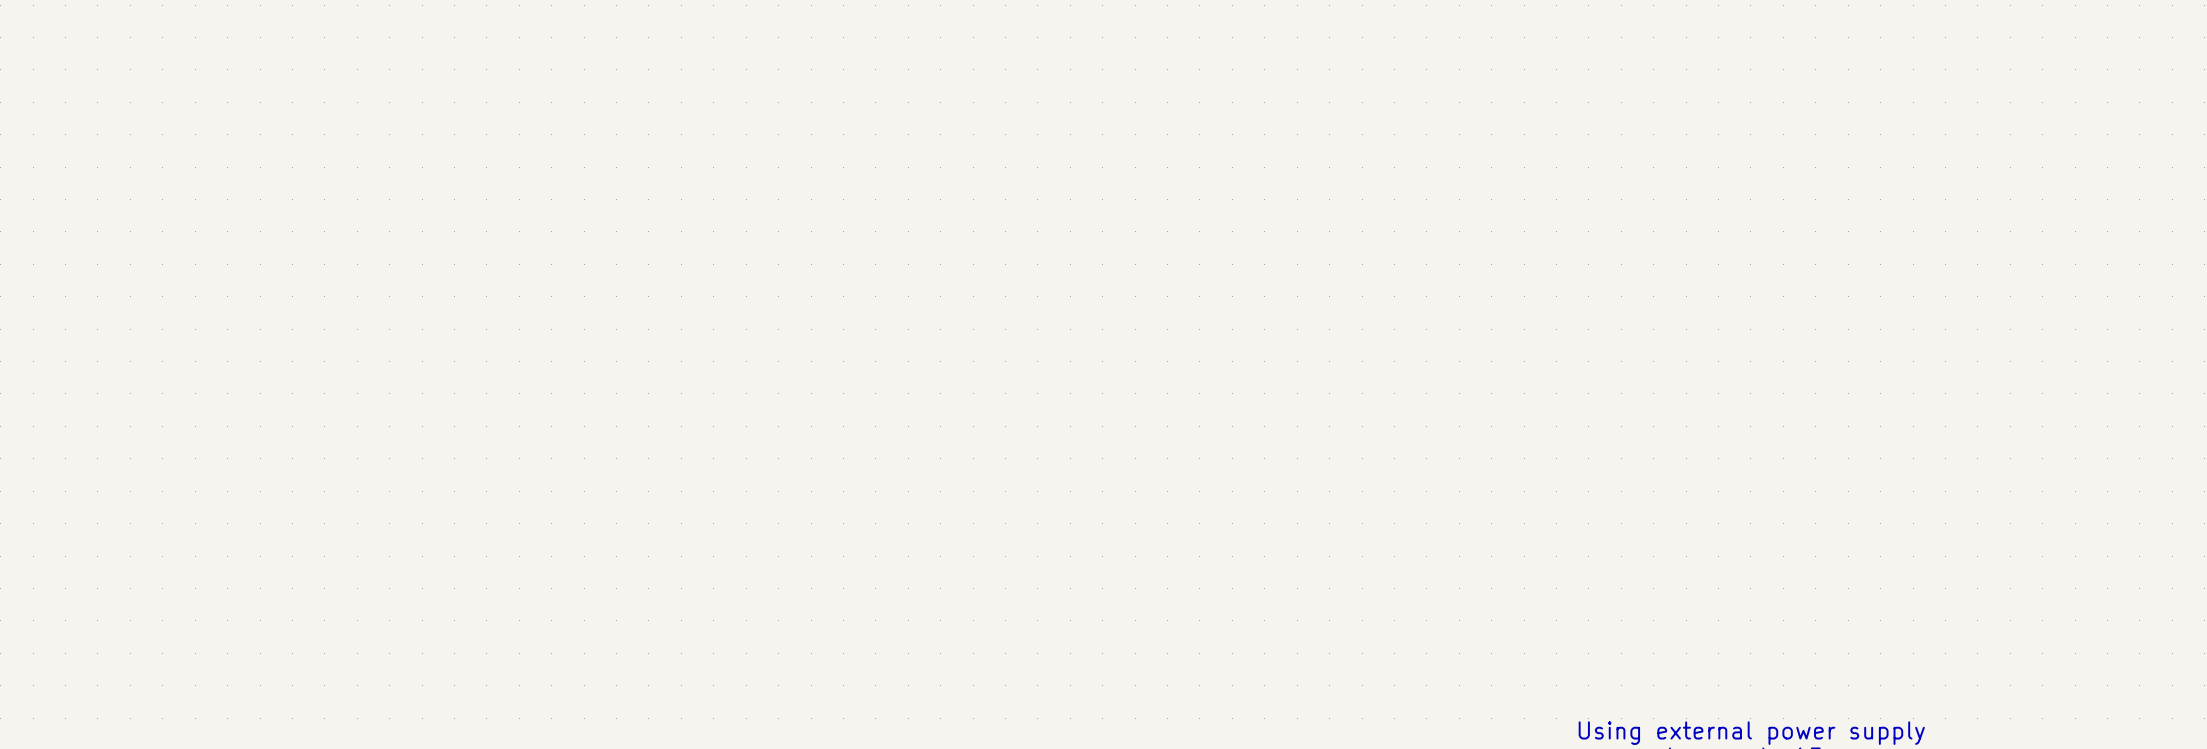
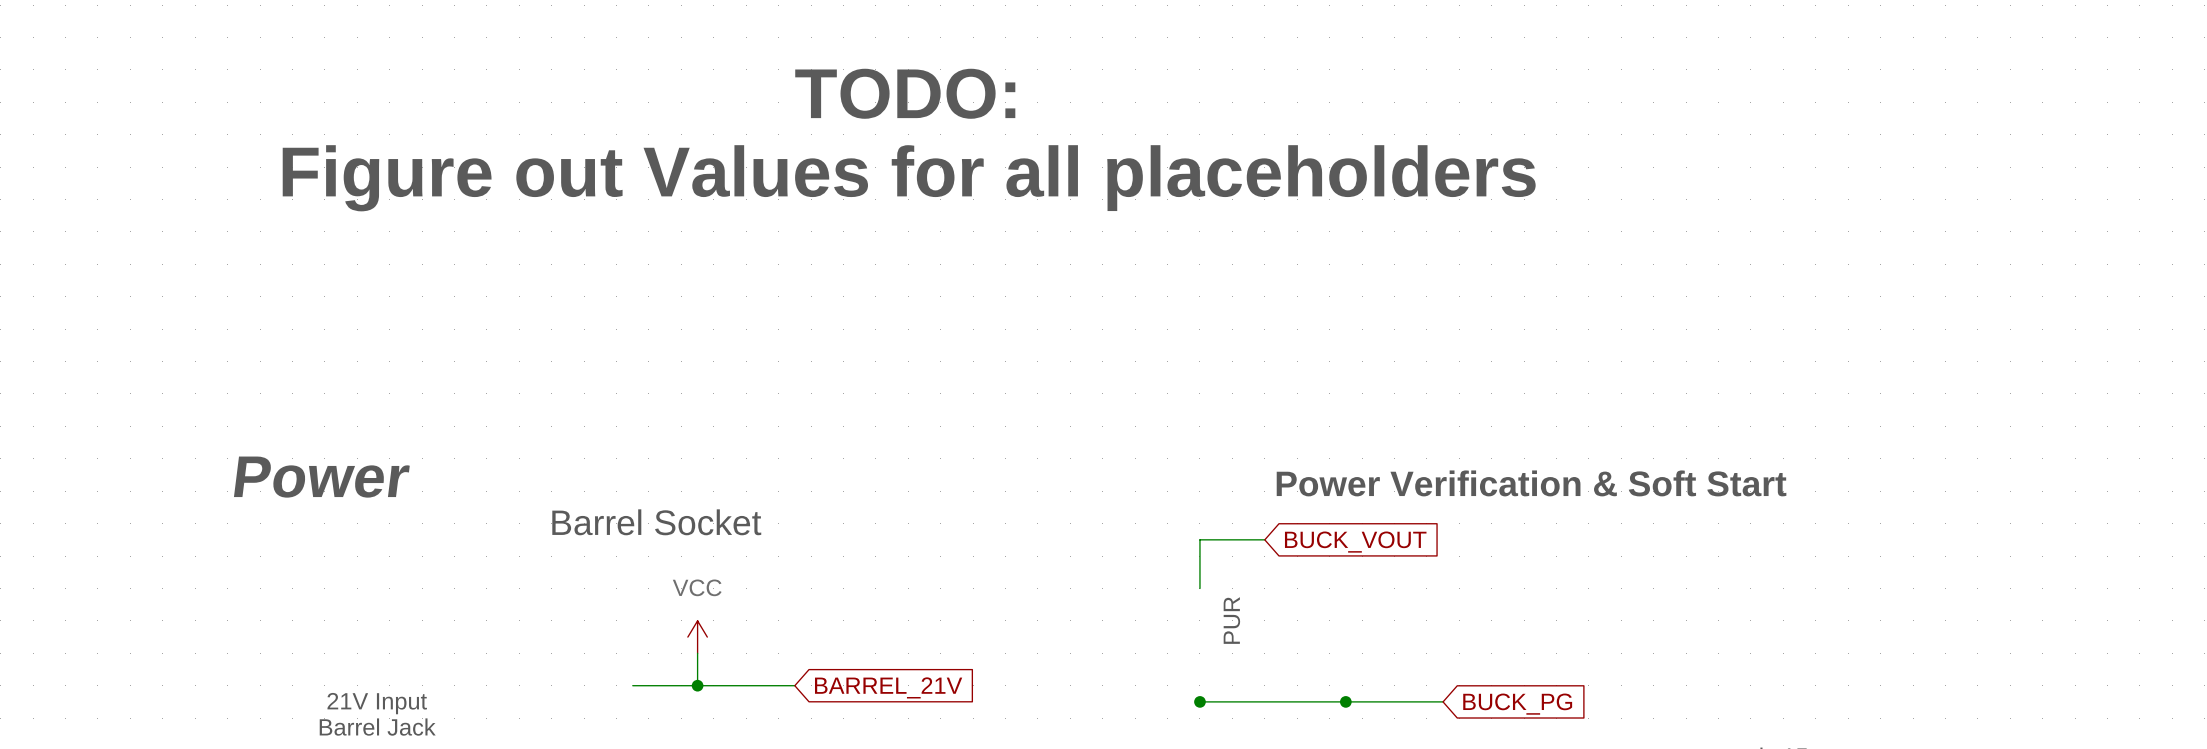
text: none -> TODO: (905, 93)
text: none -> Figure out Values for all placeholders (909, 178)
text: none -> Power (321, 477)
text: none -> Power Verification & Soft Start (1531, 483)
text: none -> Barrel Socket (656, 522)
wire: none -> (1264, 539) (1199, 539) (1199, 588)
global label: none -> BUCK_VOUT (1355, 542)
text: none -> PUR (1231, 620)
power symbol: none -> VCC (697, 637)
wire: none -> (697, 653) (697, 685)
wire: none -> (632, 685) (794, 685)
junction: none -> (697, 685)
global label: none -> BARREL_21V (888, 687)
wire: none -> (1199, 701) (1443, 701)
junction: none -> (1199, 701)
junction: none -> (1345, 701)
global label: none -> BUCK_PG (1517, 704)
text: none -> 21V Input (377, 703)
text: none -> Barrel Jack (377, 727)
text: Using external power supply (1751, 733) -> none

